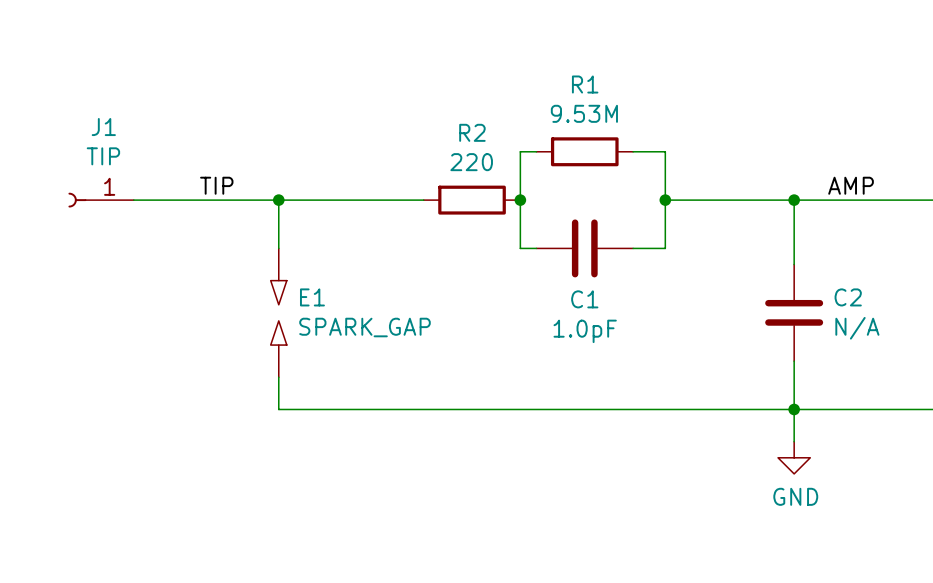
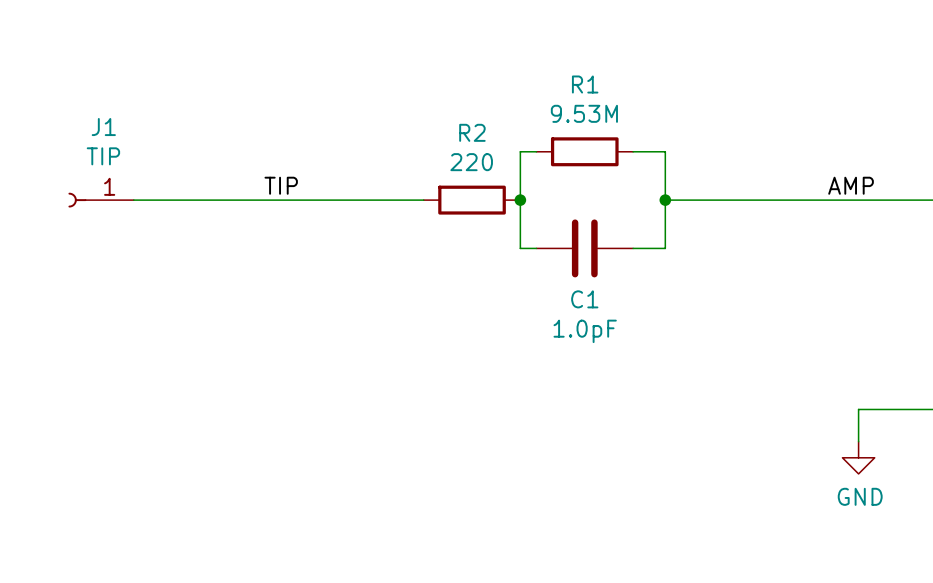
label position: TIP (216, 185) -> TIP (281, 185)
wire: (278, 200) (278, 248) -> none
junction: (278, 200) -> none
wire: (794, 200) (794, 264) -> none
junction: (794, 200) -> none
E1: SPARK_GAP (278, 312) -> none
C2: N/A (794, 312) -> none
wire: (794, 361) (794, 441) -> none
wire: (278, 377) (278, 409) (858, 409) -> (858, 441) (858, 409)
junction: (794, 409) -> none
power symbol position: GND (794, 457) -> GND (858, 457)

